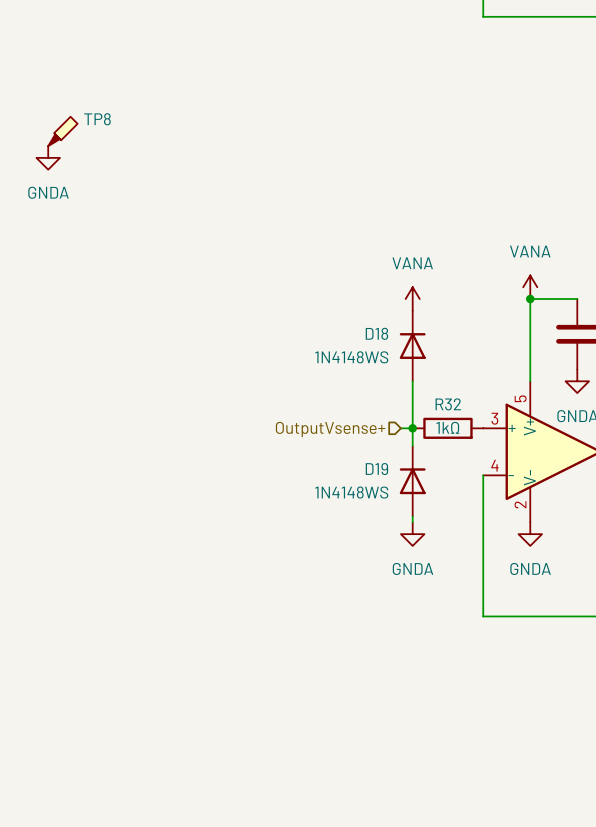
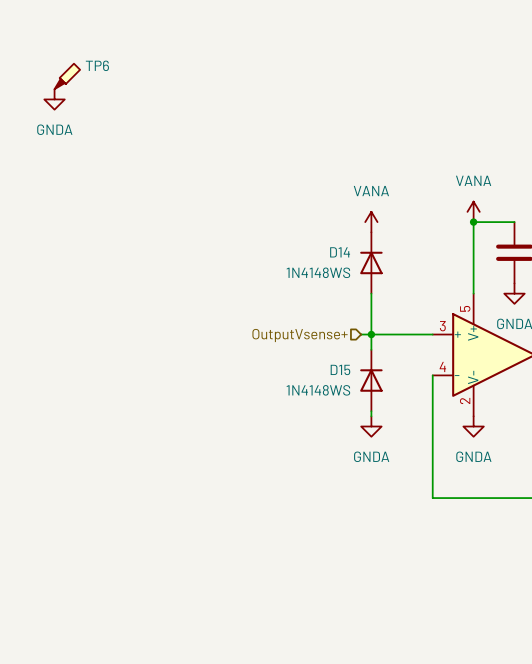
TP8 name: TP8 (97, 119) -> TP6 (97, 65)
D18 name: D18 (376, 333) -> D14 (340, 252)
wire: none -> (371, 334) (432, 334)
R32: 1kΩ (447, 428) -> none
D19 name: D19 (376, 469) -> D15 (340, 369)

